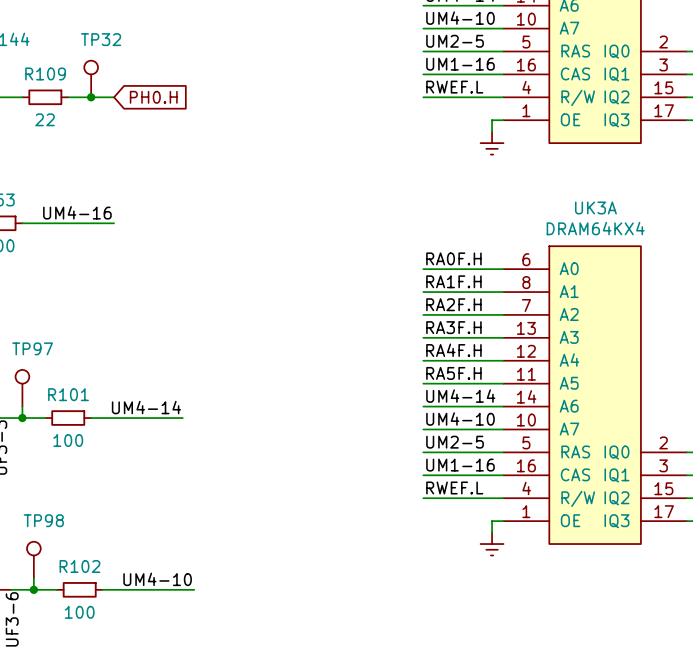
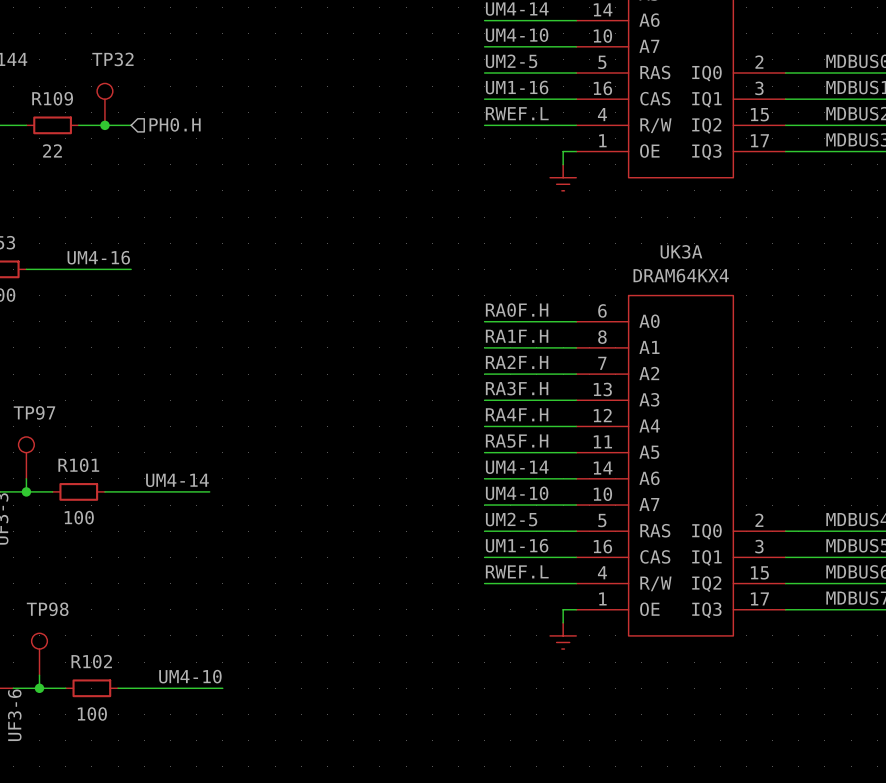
hierarchical label: none -> PH0.H (175, 124)
global label: PH0.H (153, 97) -> none

